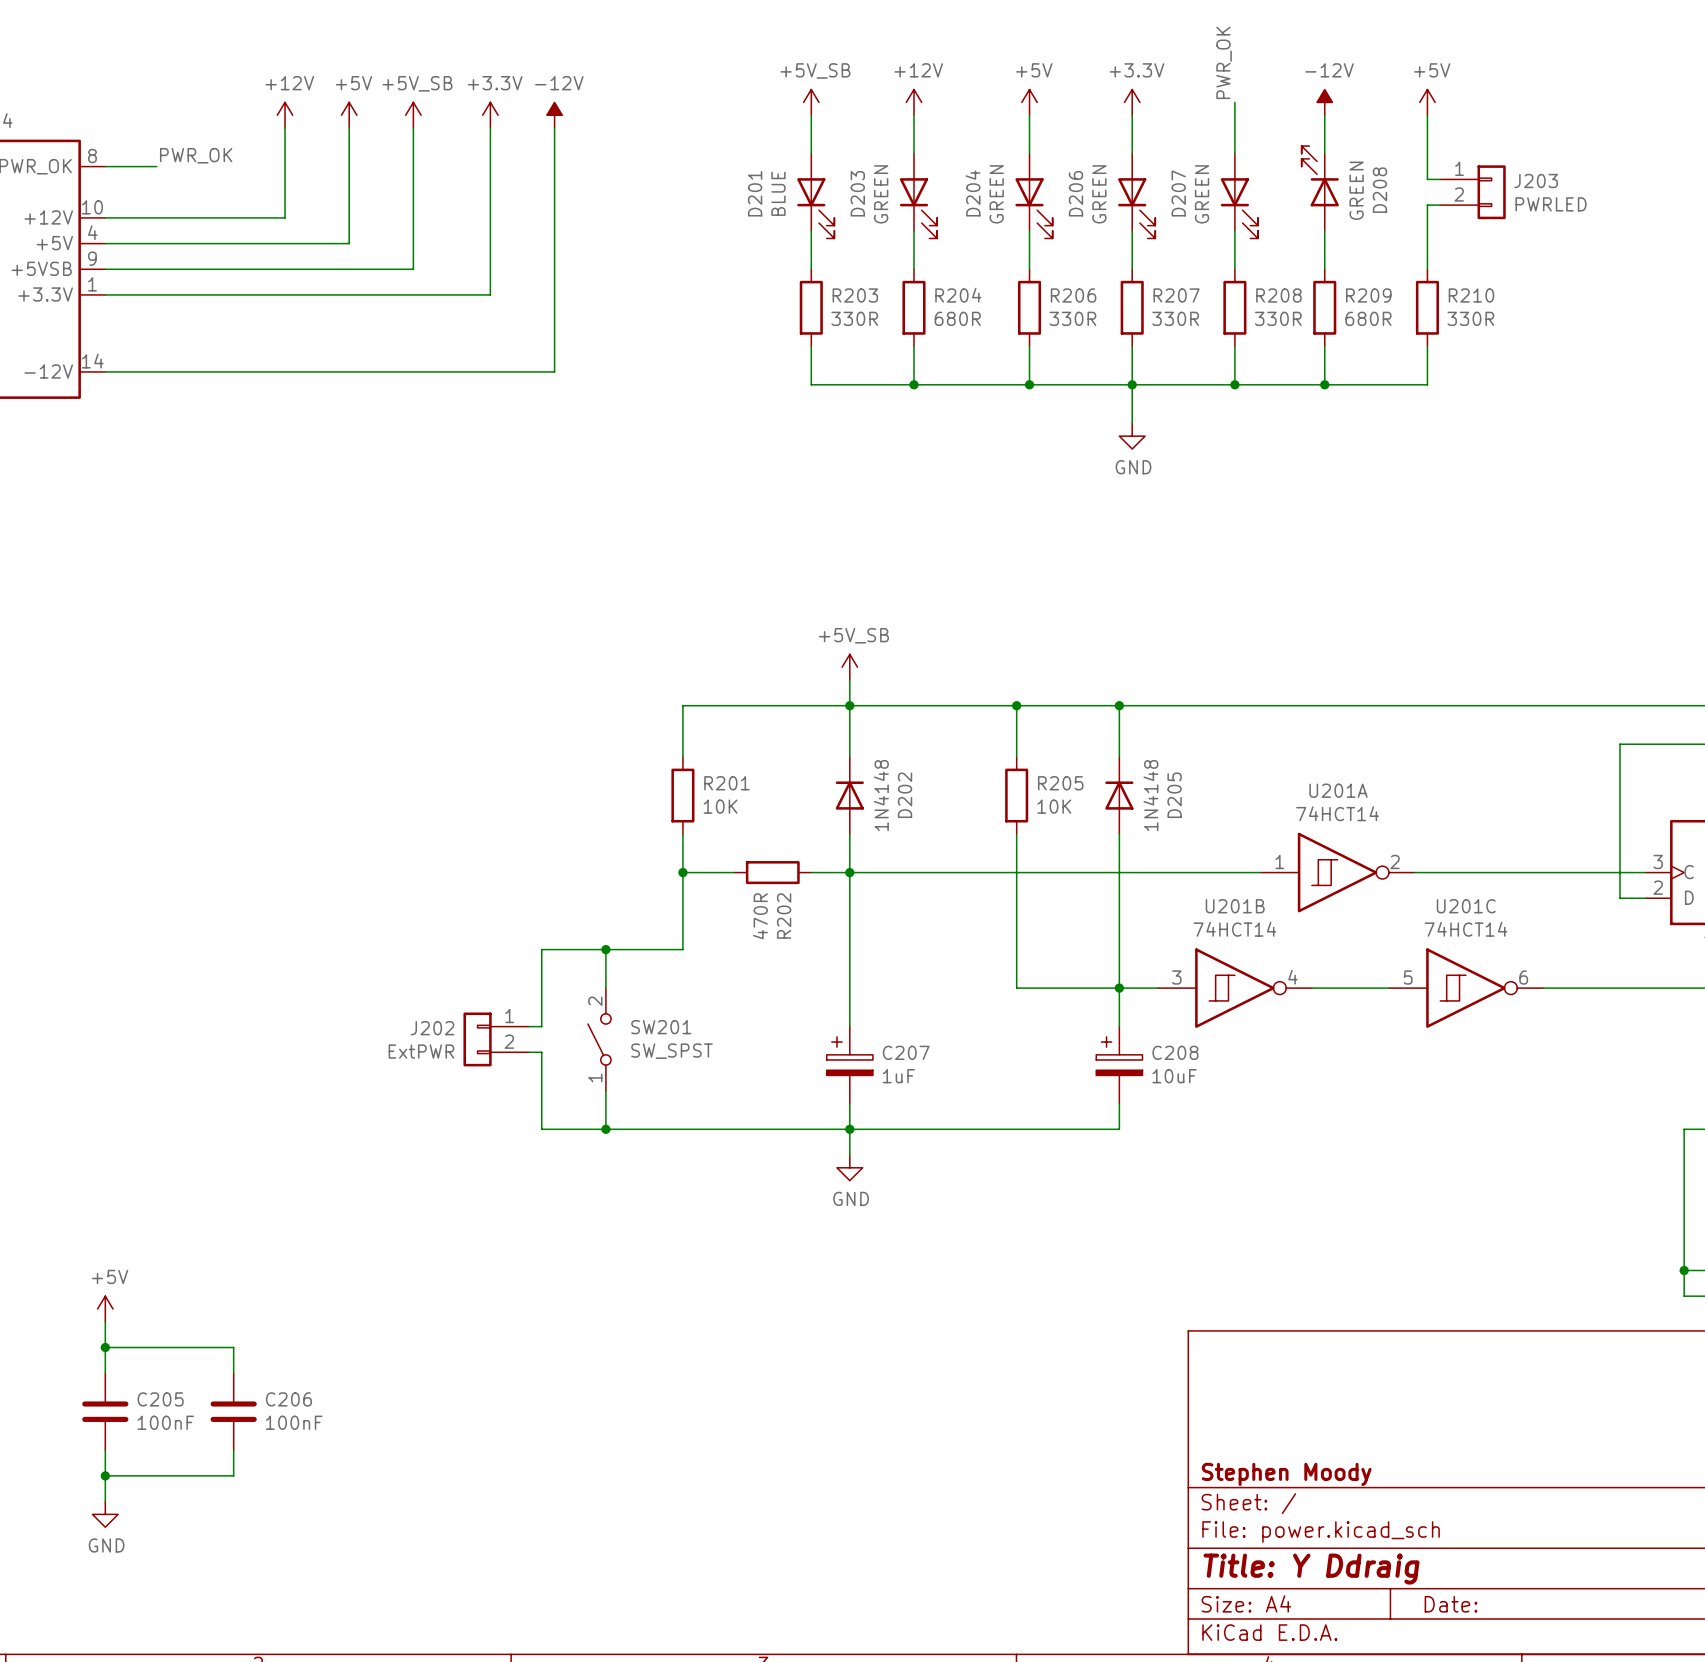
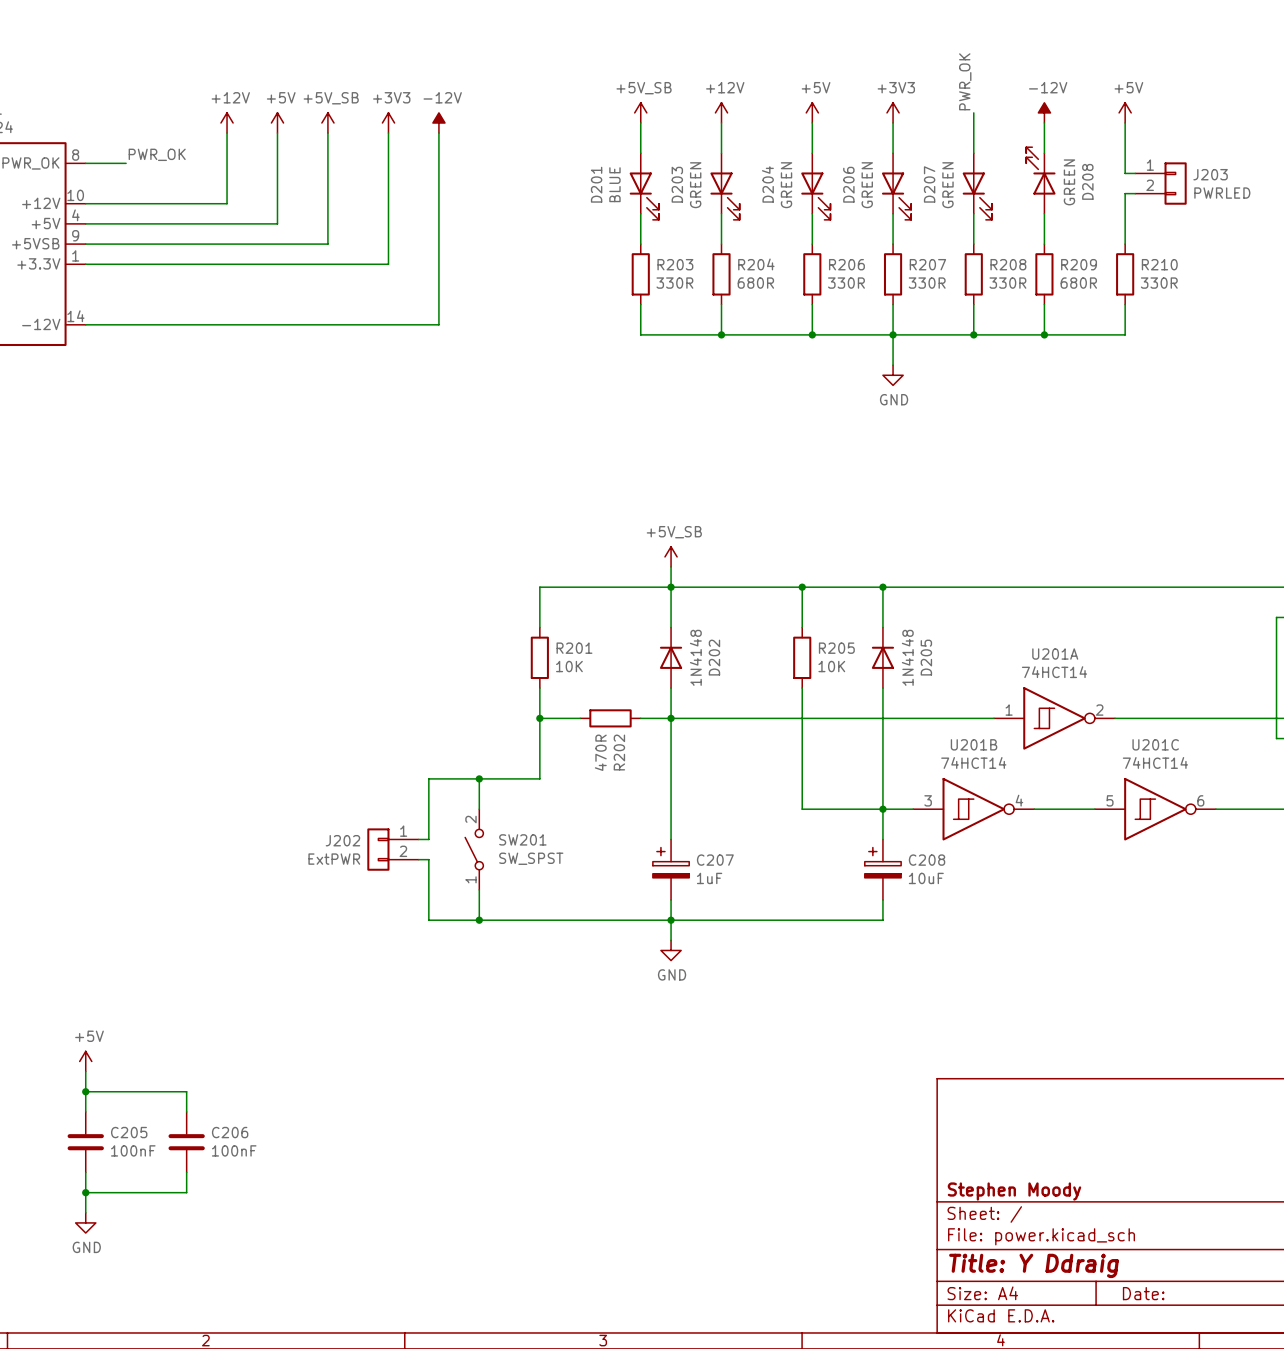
power symbol: +3.3V (1132, 102) -> +3V3 (893, 112)
power symbol: +3.3V (490, 115) -> +3V3 (388, 122)

